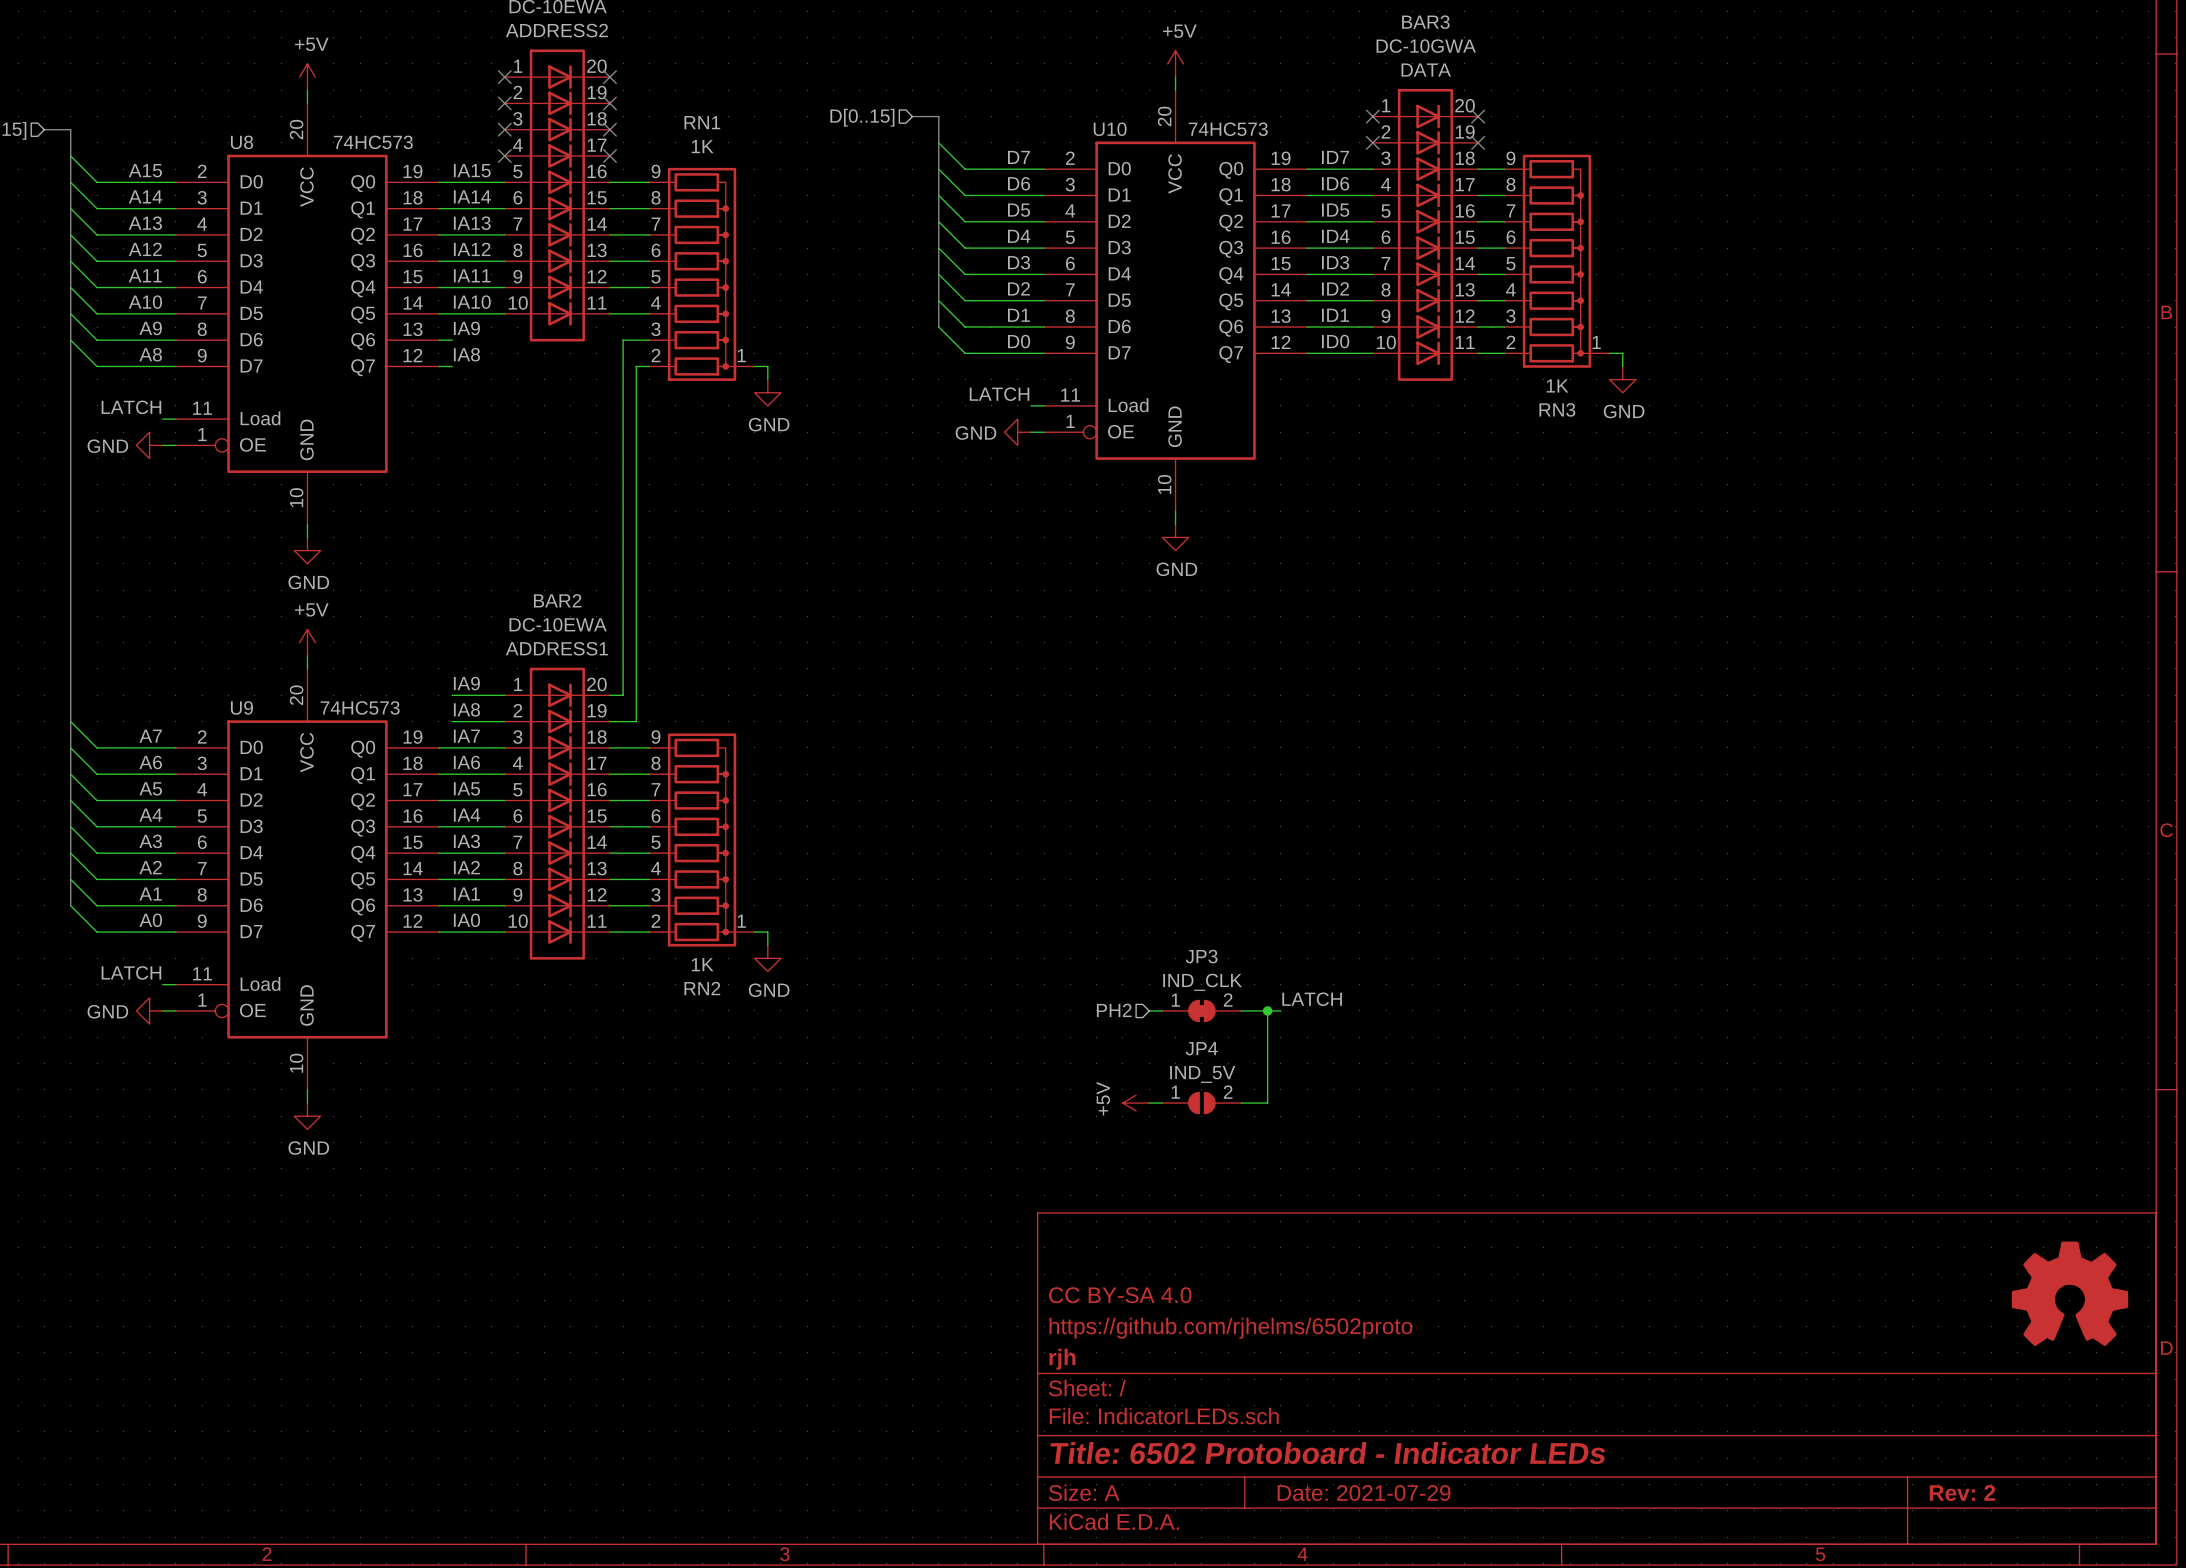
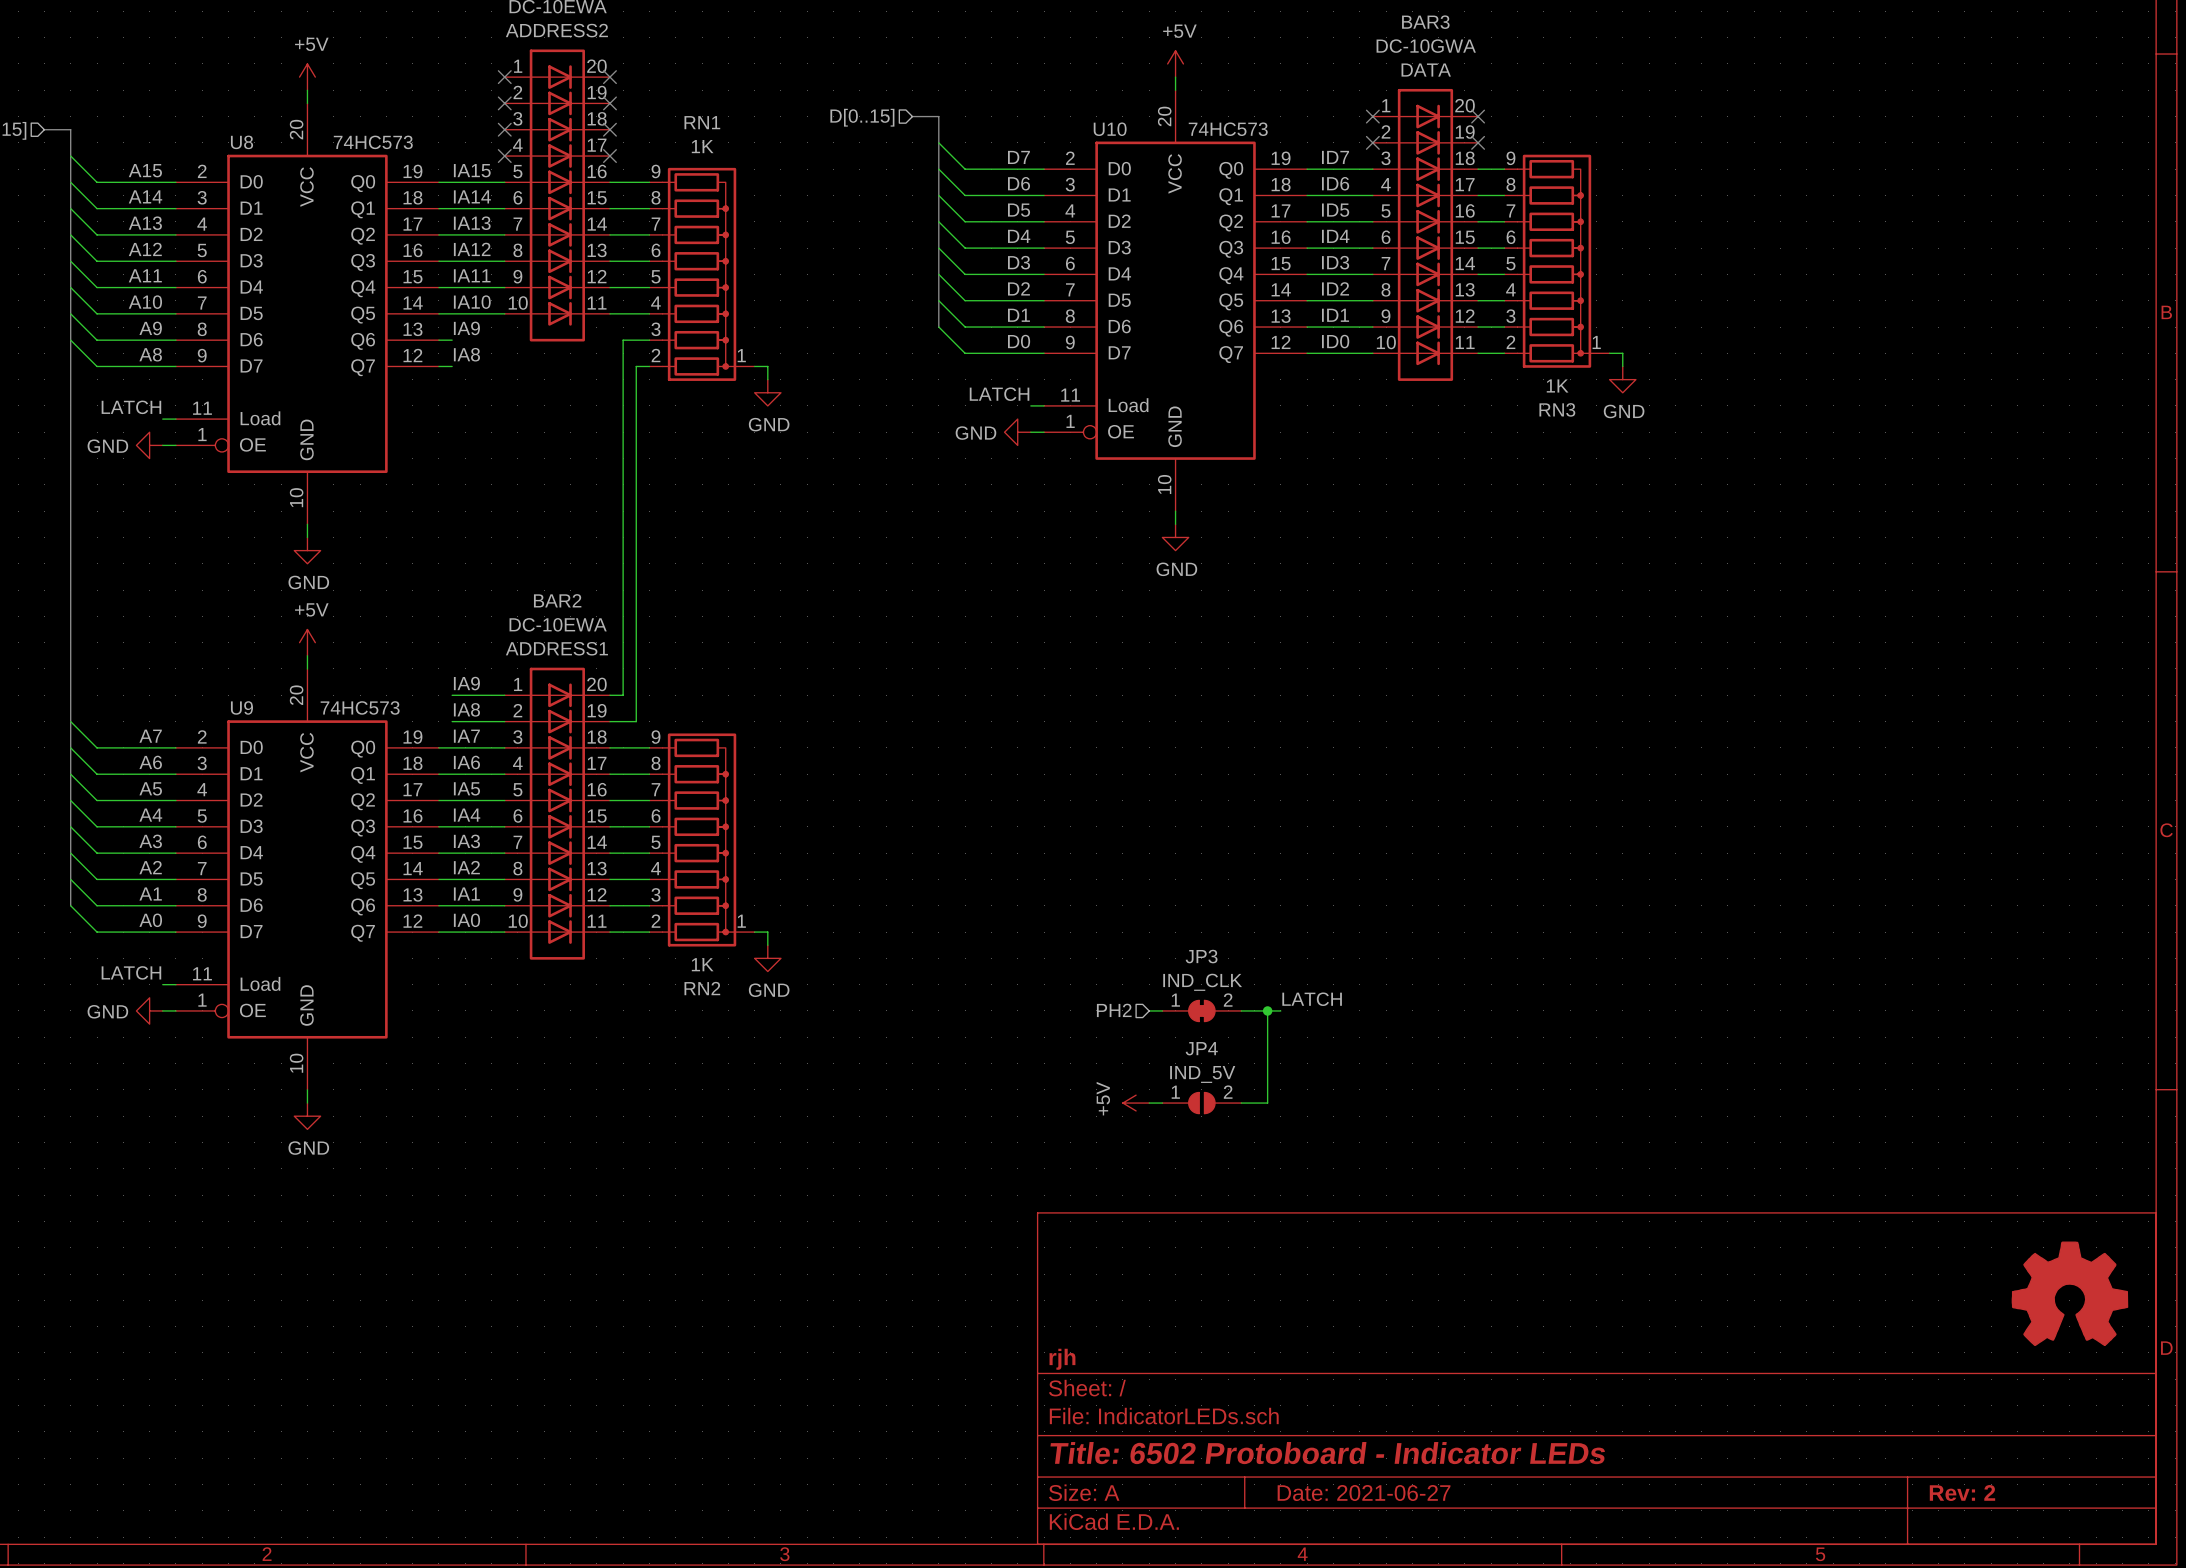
title block: CC BY-SA 4.0 (1120, 1295) -> none
title block: https://github.com/rjhelms/6502proto (1230, 1328) -> none
title block: Date: 2021-07-29 (1364, 1493) -> Date: 2021-06-27 (1364, 1493)

